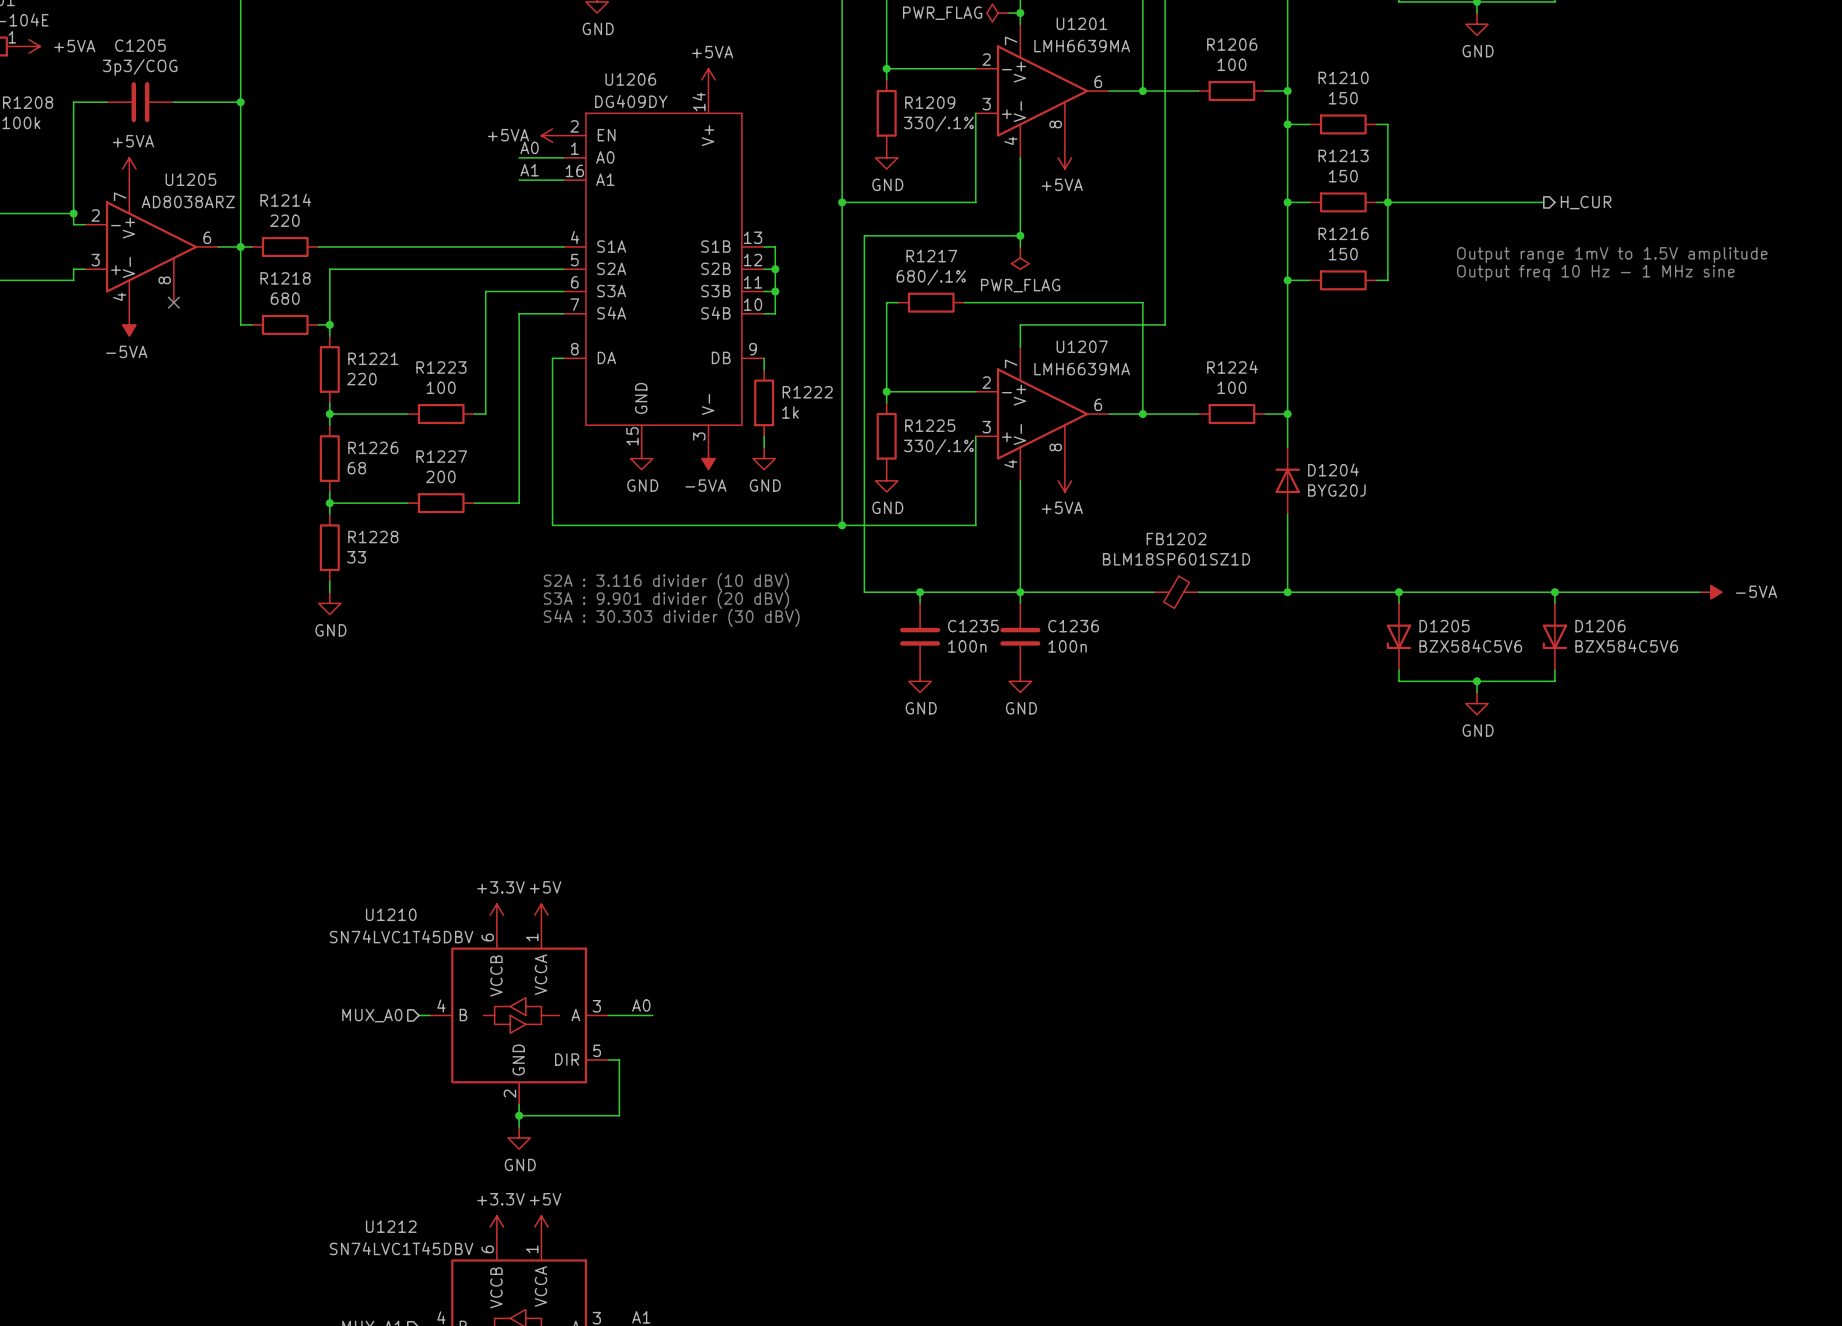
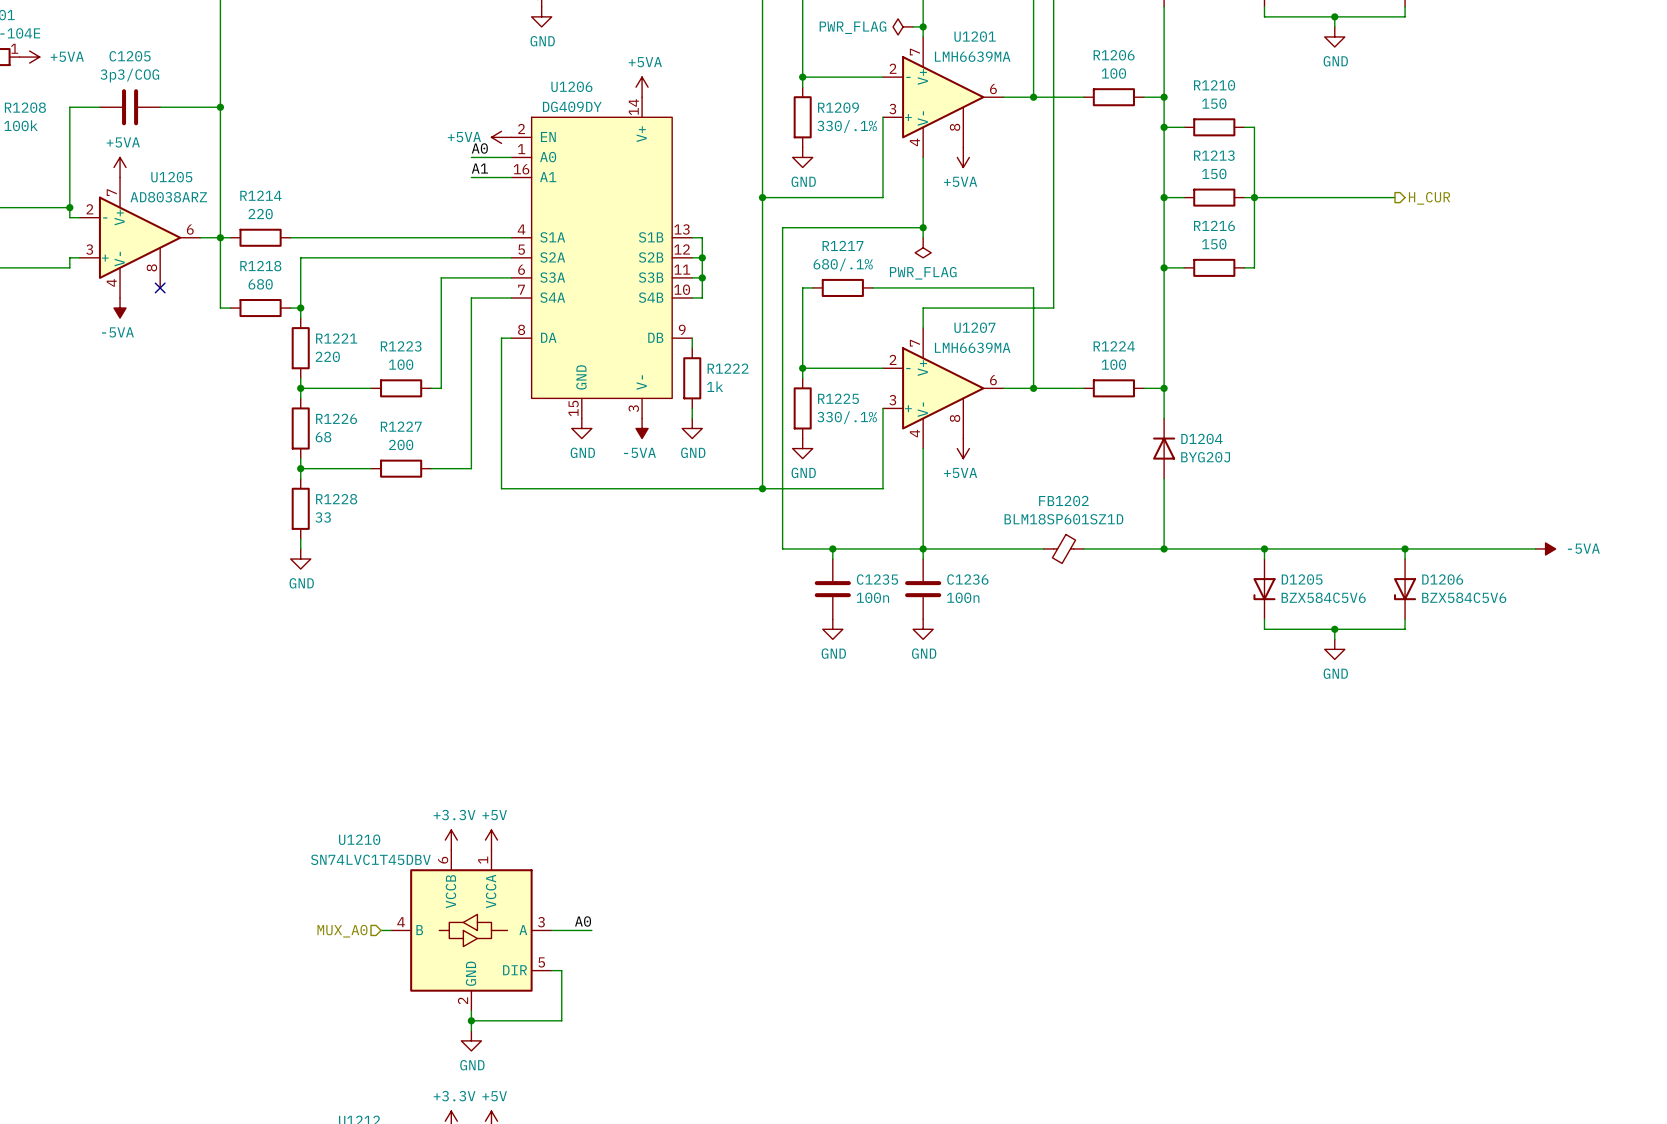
text: Output range 1mV to 1.5V amplitude (1612, 255) -> none
text: Output freq 10 Hz - 1 MHz sine (1595, 273) -> none
text: S2A : 3.116 divider (10 dBV) (666, 581) -> none
text: S3A : 9.901 divider (20 dBV) (666, 599) -> none
text: S4A : 30.303 divider (30 dBV) (671, 617) -> none

